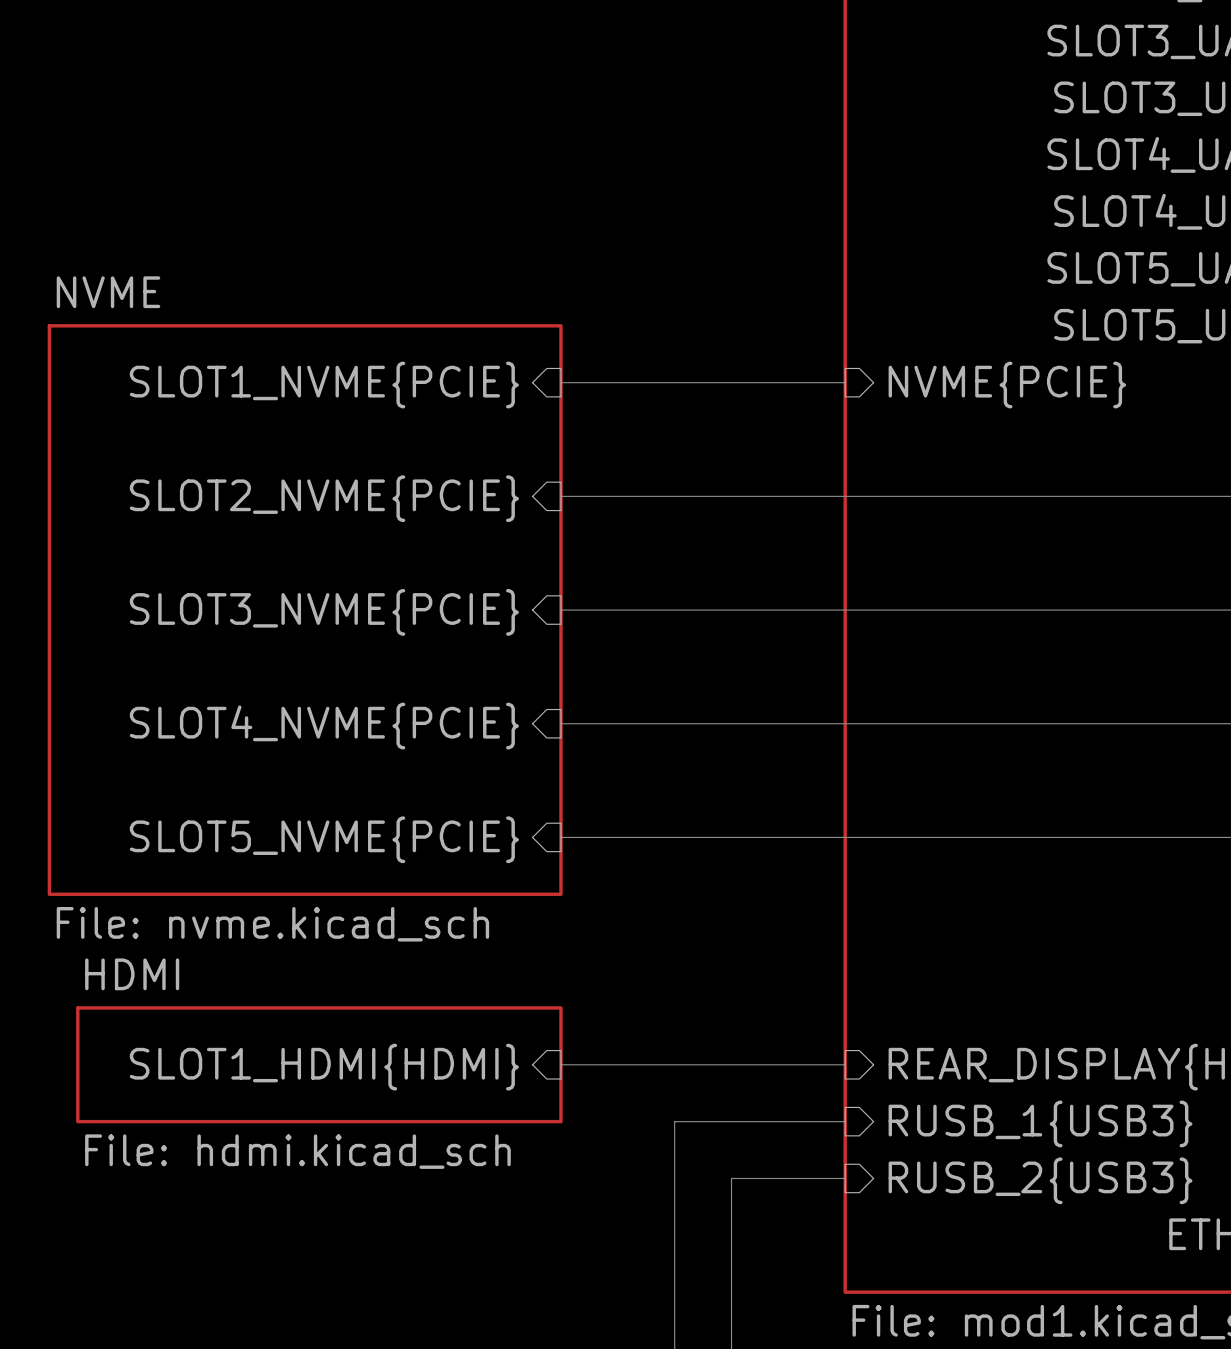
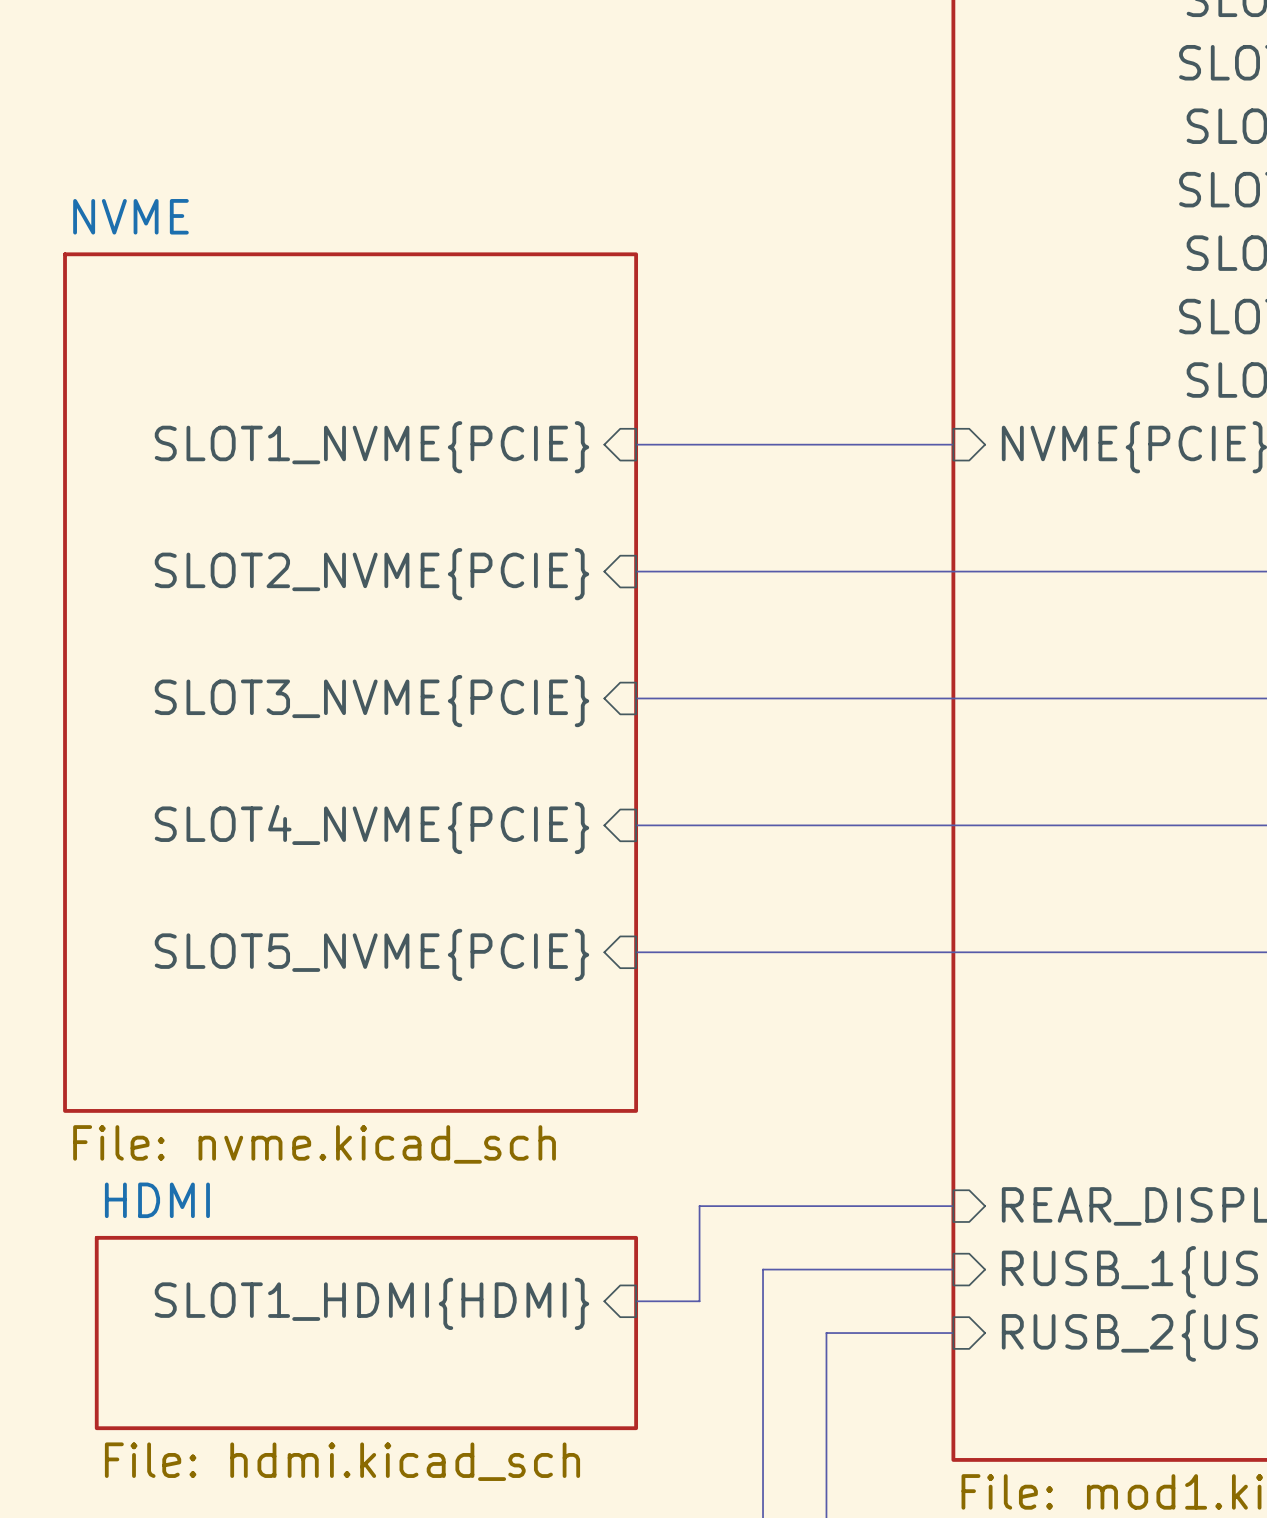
sheet NVME name position: NVME (108, 292) -> NVME (130, 216)
sheet NVME shape: [47, 324, 563, 896] -> [63, 252, 639, 1113]
sheet NVME value position: File: nvme.kicad_sch (272, 924) -> File: nvme.kicad_sch (314, 1144)
sheet HDMI: File: hdmi.kicad_sch (319, 1064) -> none
bus: (560, 1064) (617, 1064) -> (636, 1301) (699, 1301) (699, 1206)
sheet pin position: SLOT1_HDMI{HDMI} (324, 1067) -> SLOT1_HDMI{HDMI} (371, 1303)
sheet HDMI: none -> File: hdmi.kicad_sch (366, 1333)

